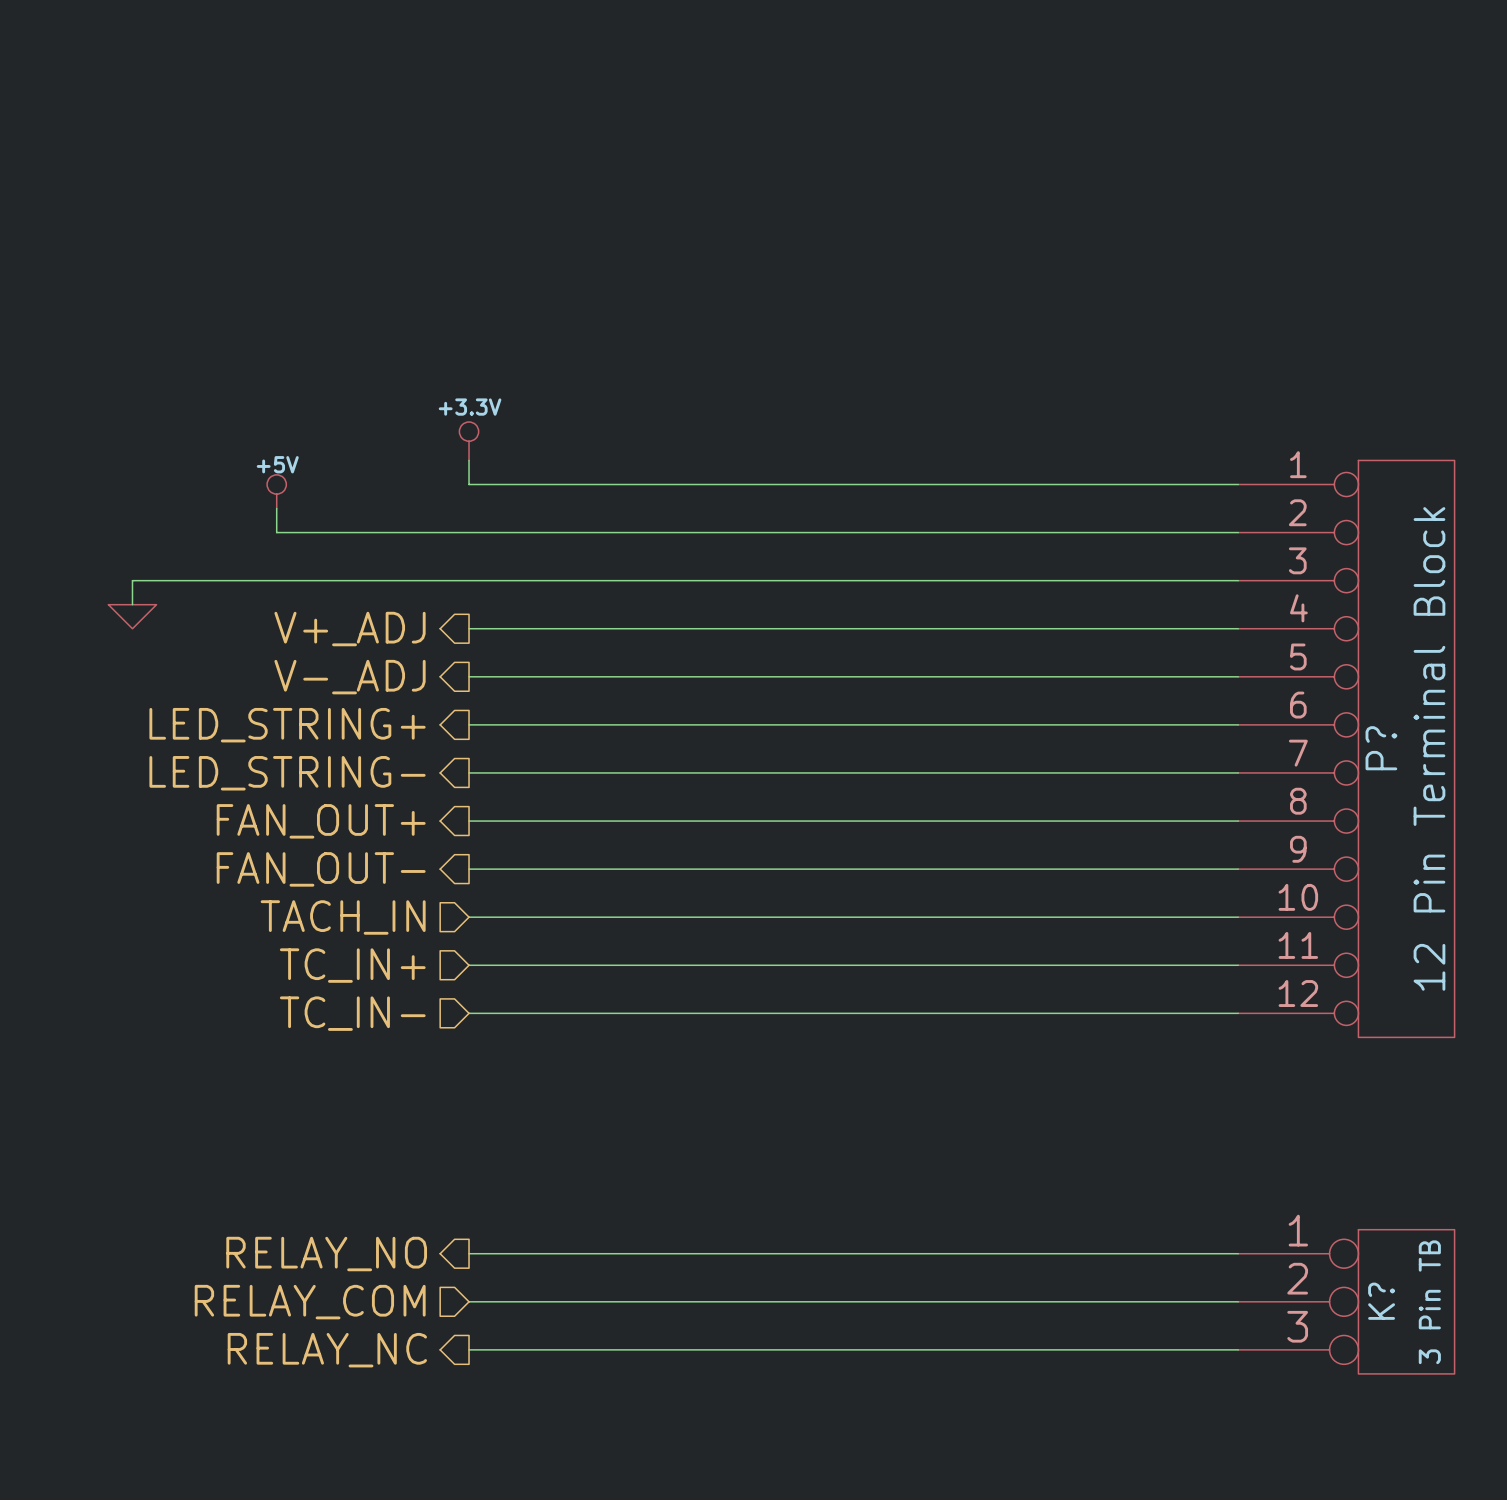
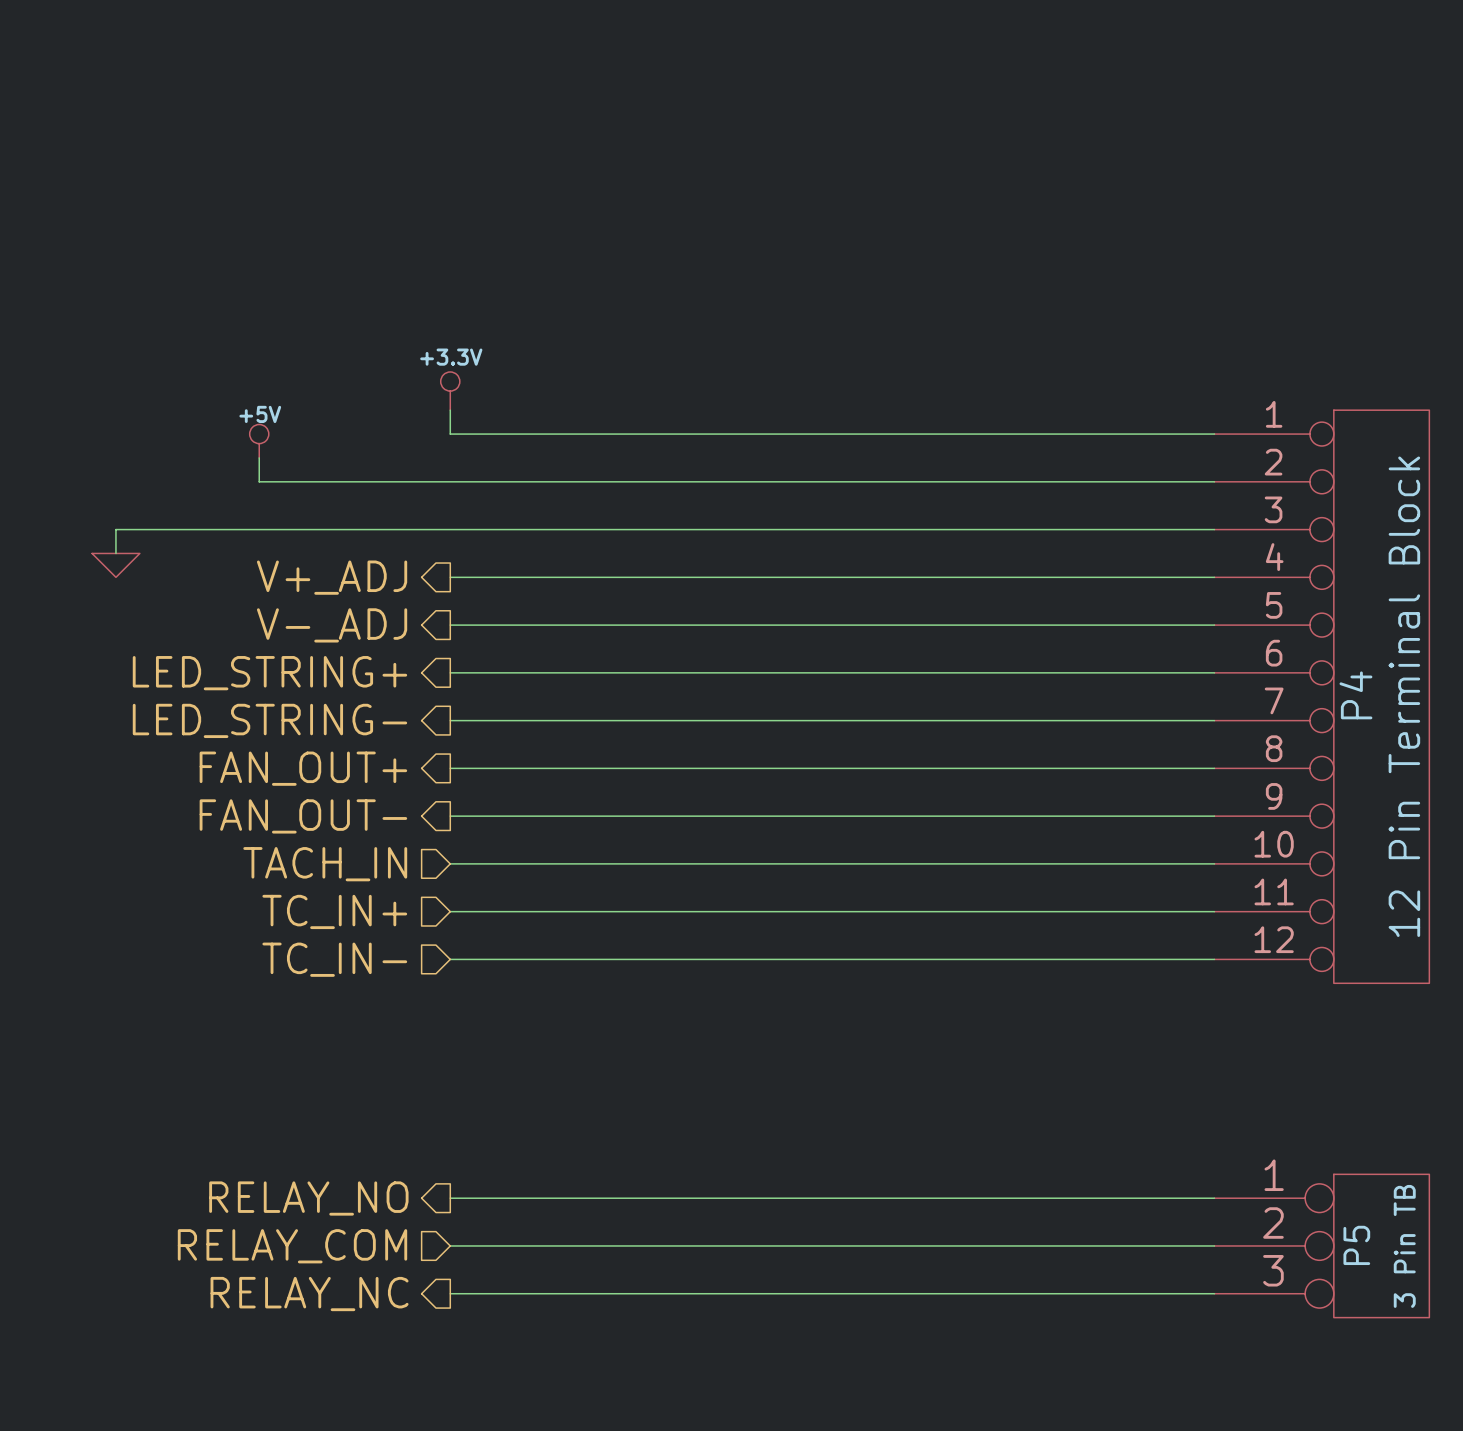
P? name: P? (1381, 748) -> P4 (1355, 695)
K? name: K? (1381, 1301) -> P5 (1356, 1245)

